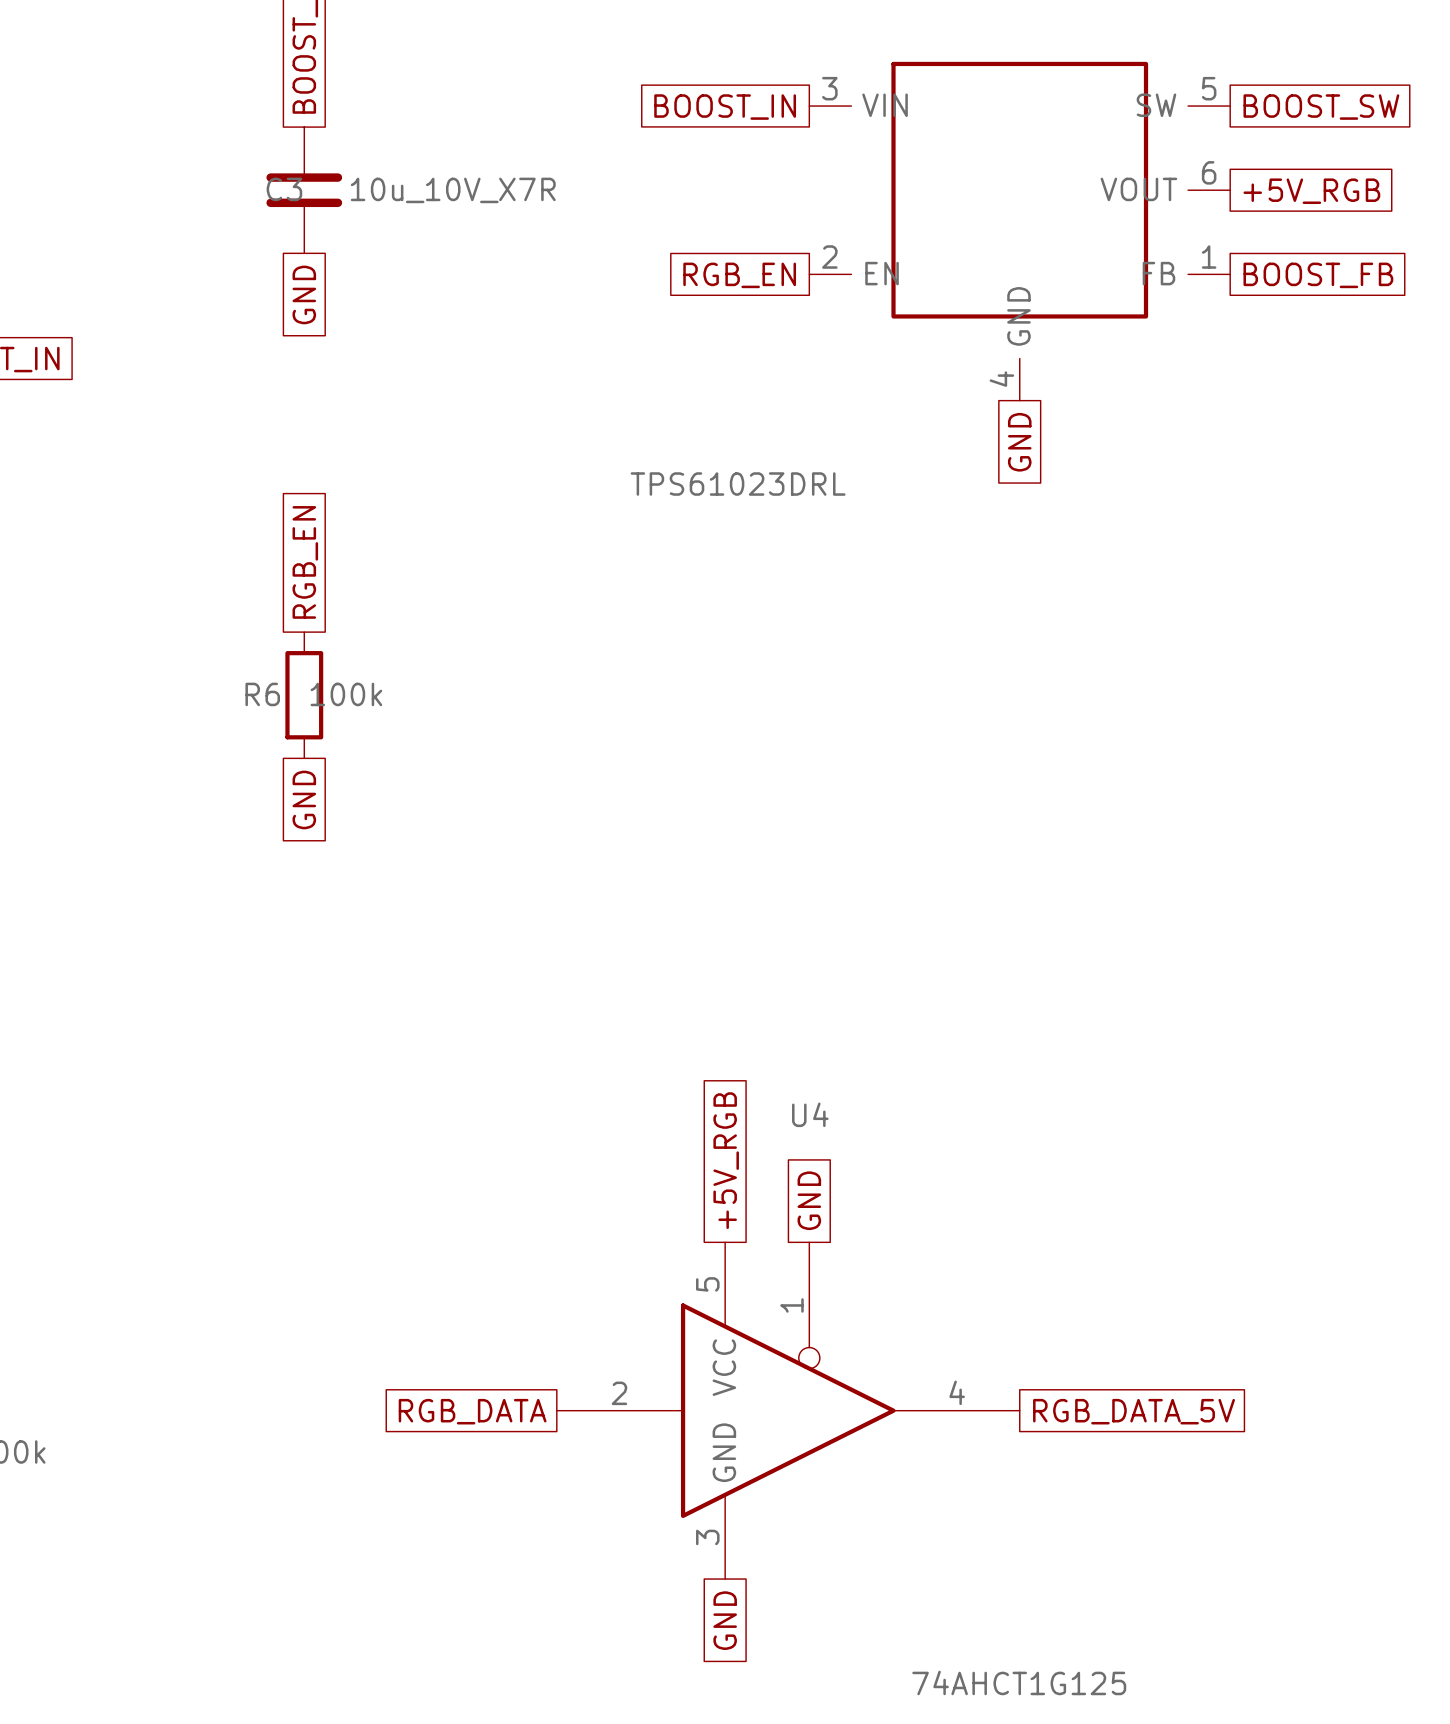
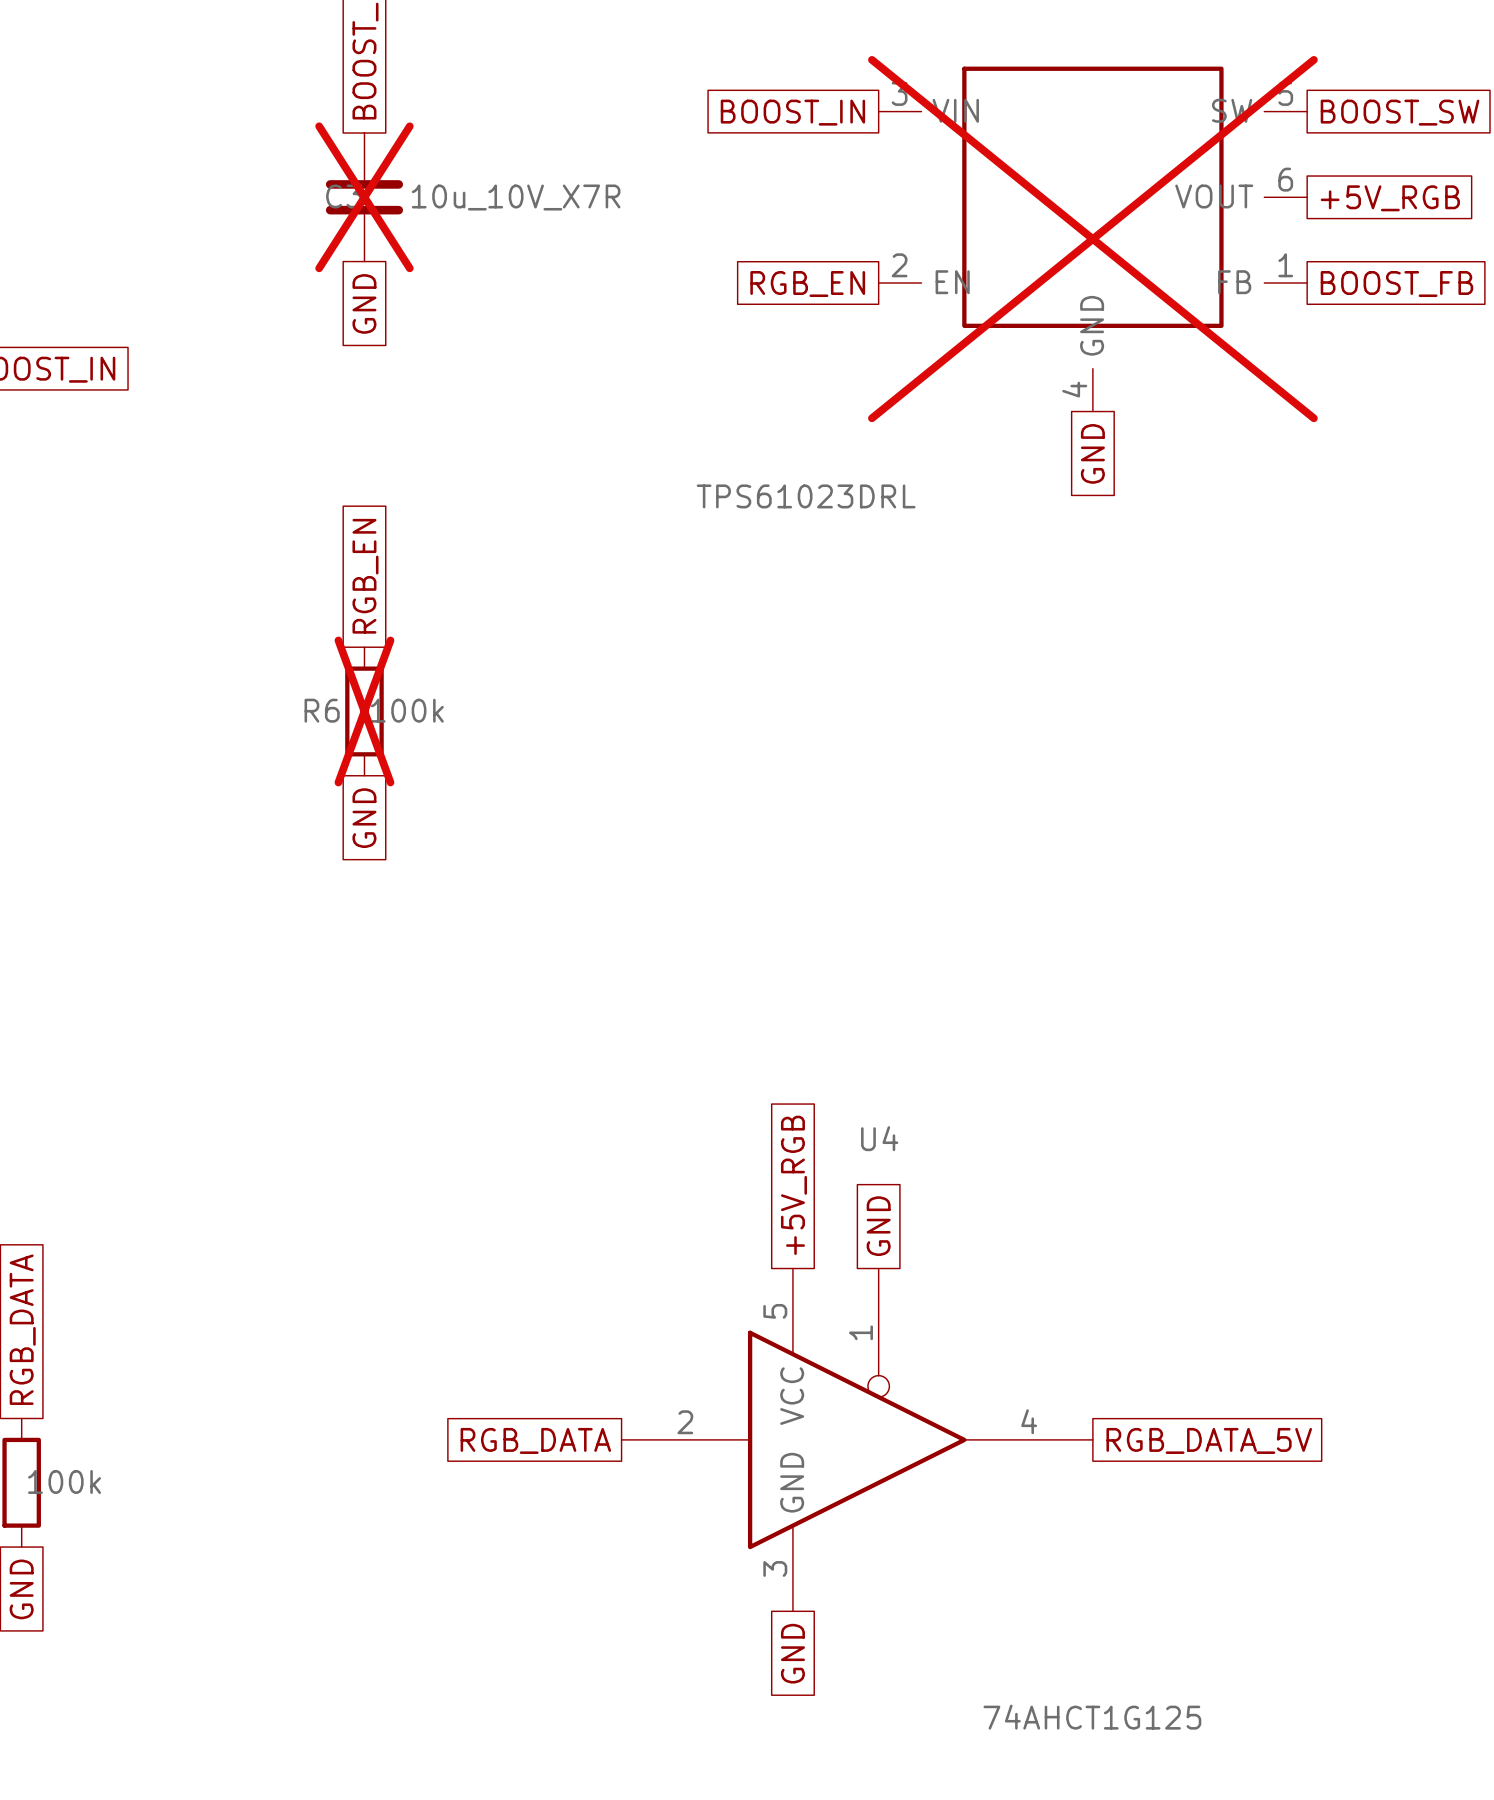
C3 do-not-place cross: none -> (364, 197)
part do-not-place cross: none -> (1092, 239)
R6 do-not-place cross: none -> (364, 711)

